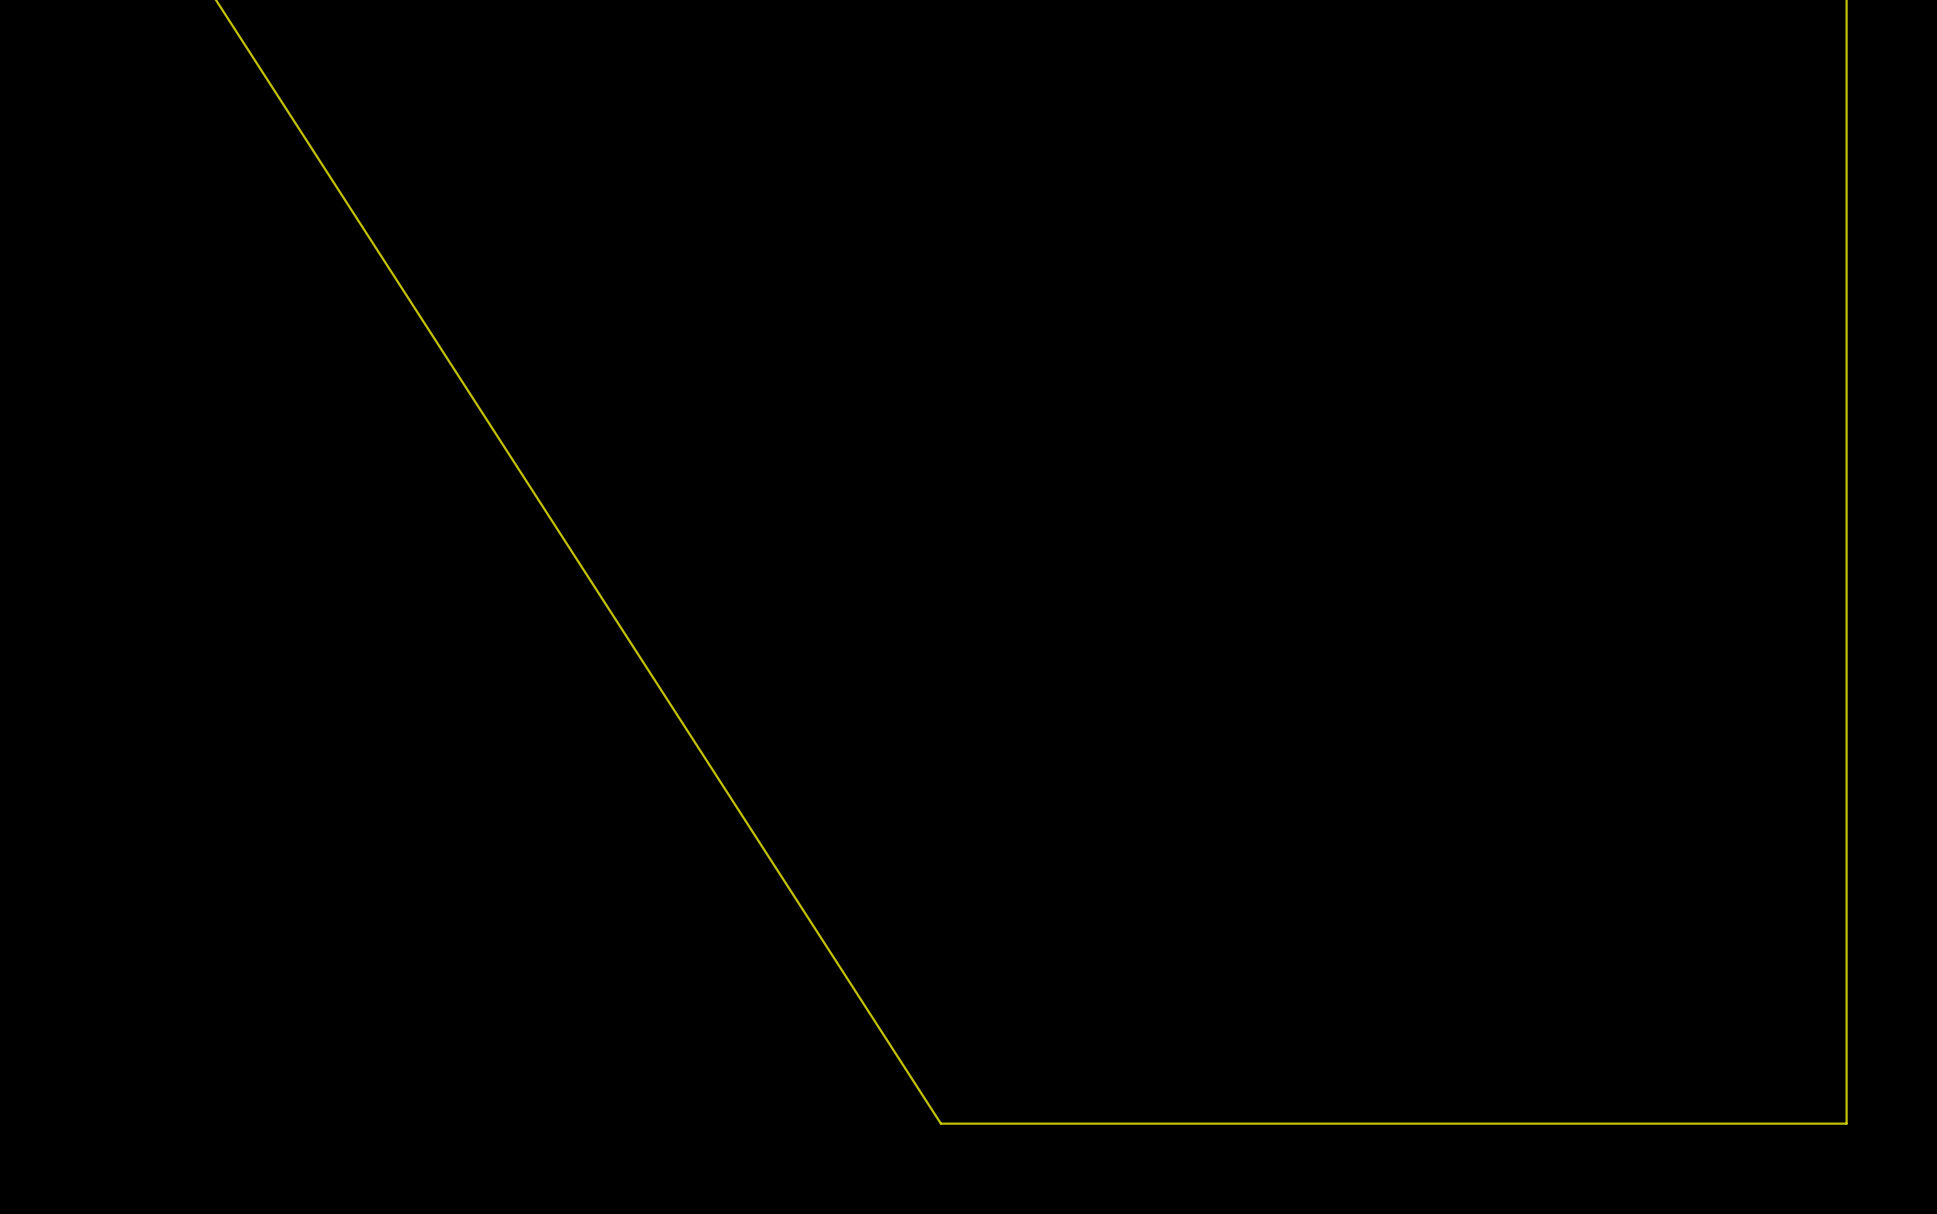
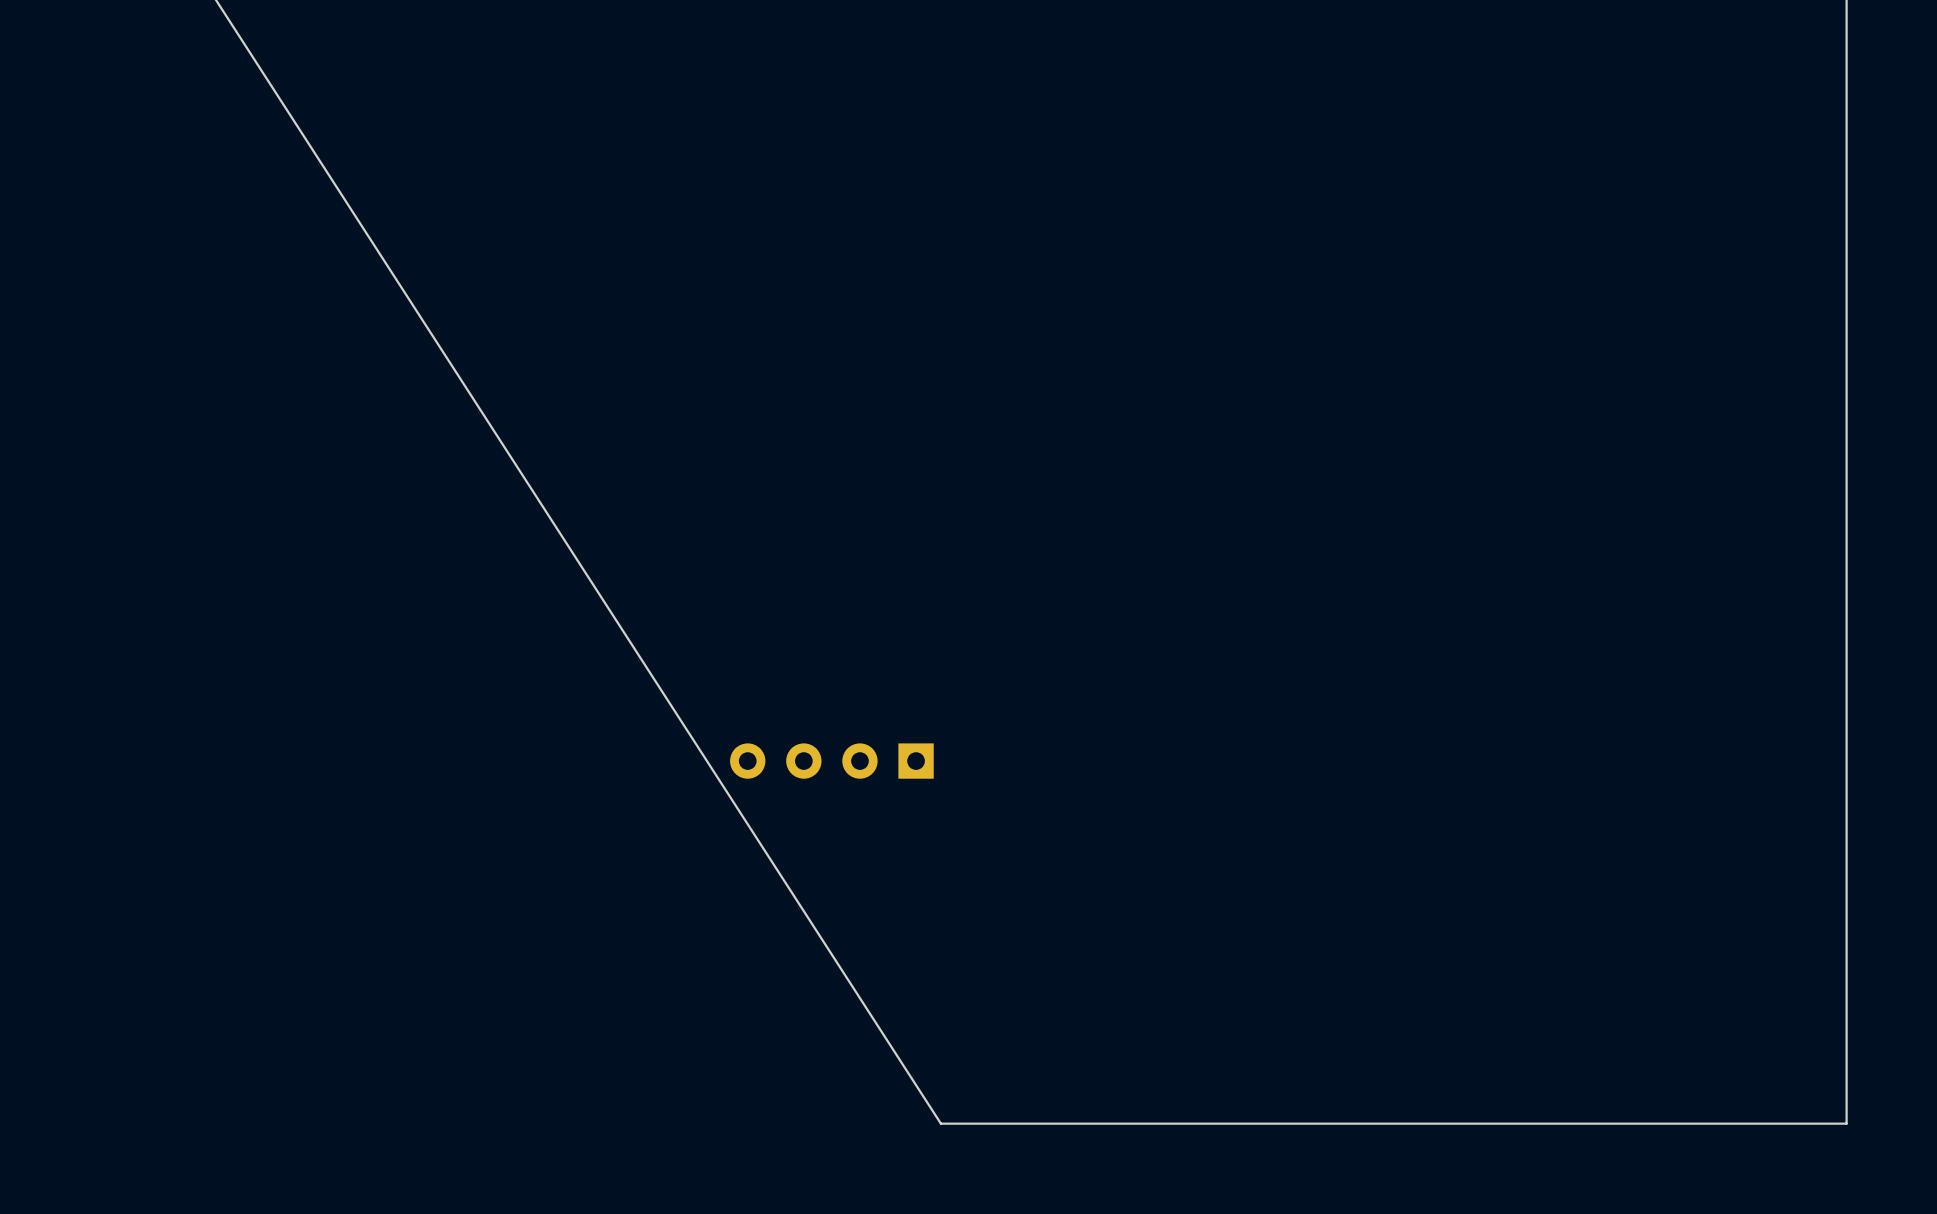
part: none -> (831, 761)

